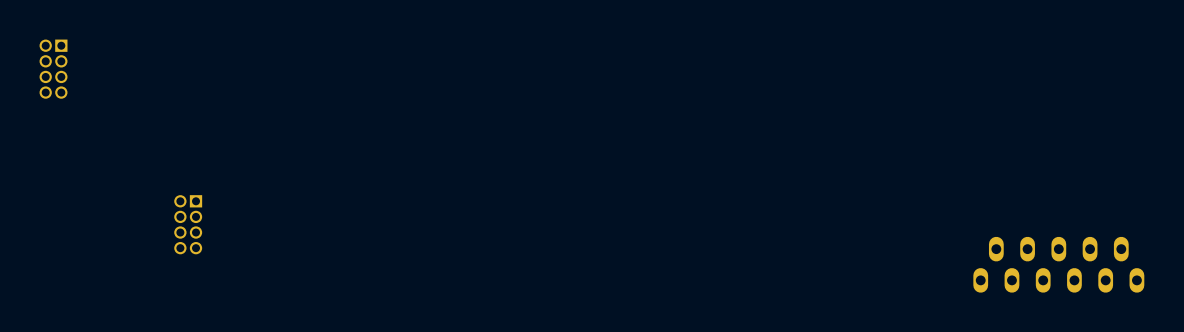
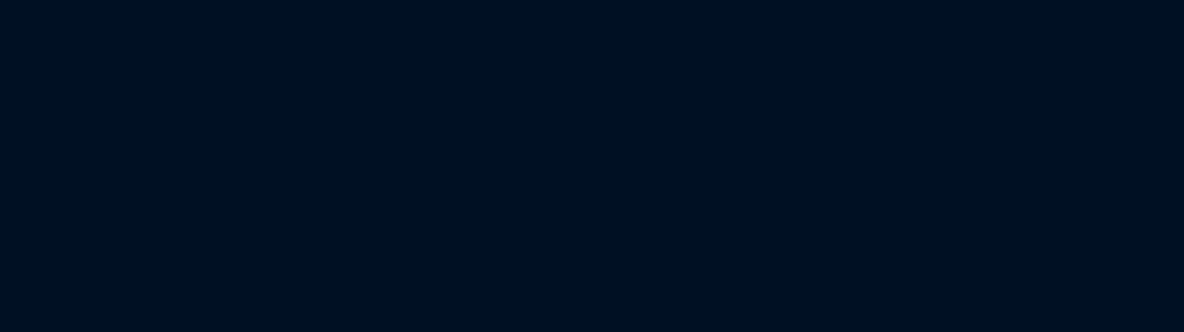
part: (53, 69) -> none
part: (188, 224) -> none
part: (1058, 264) -> none

